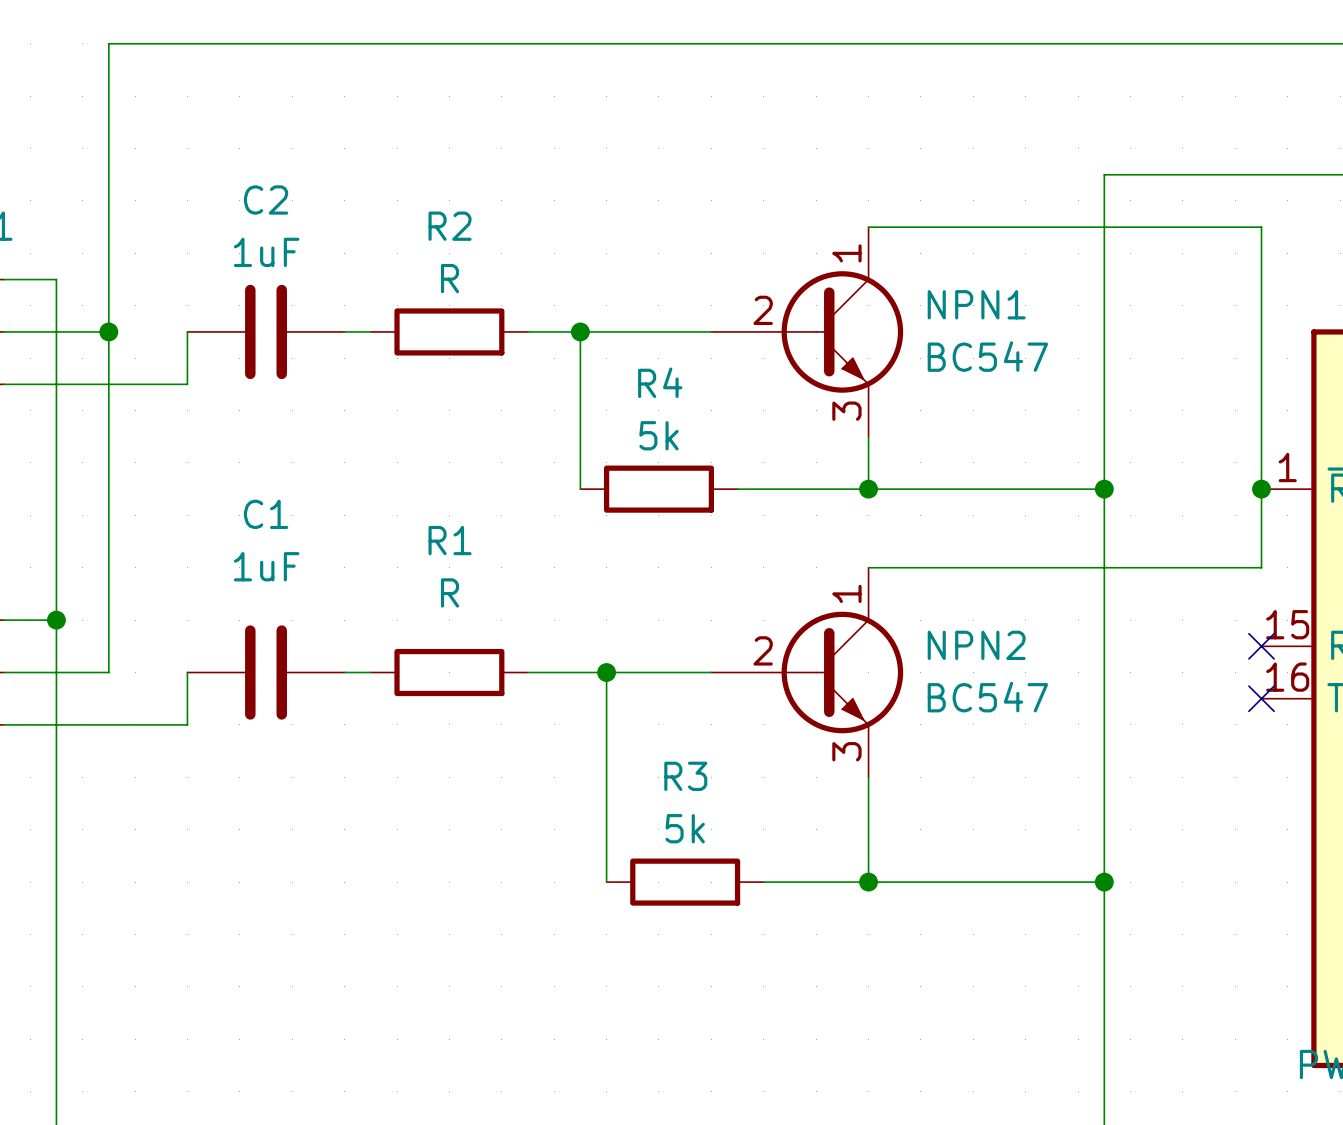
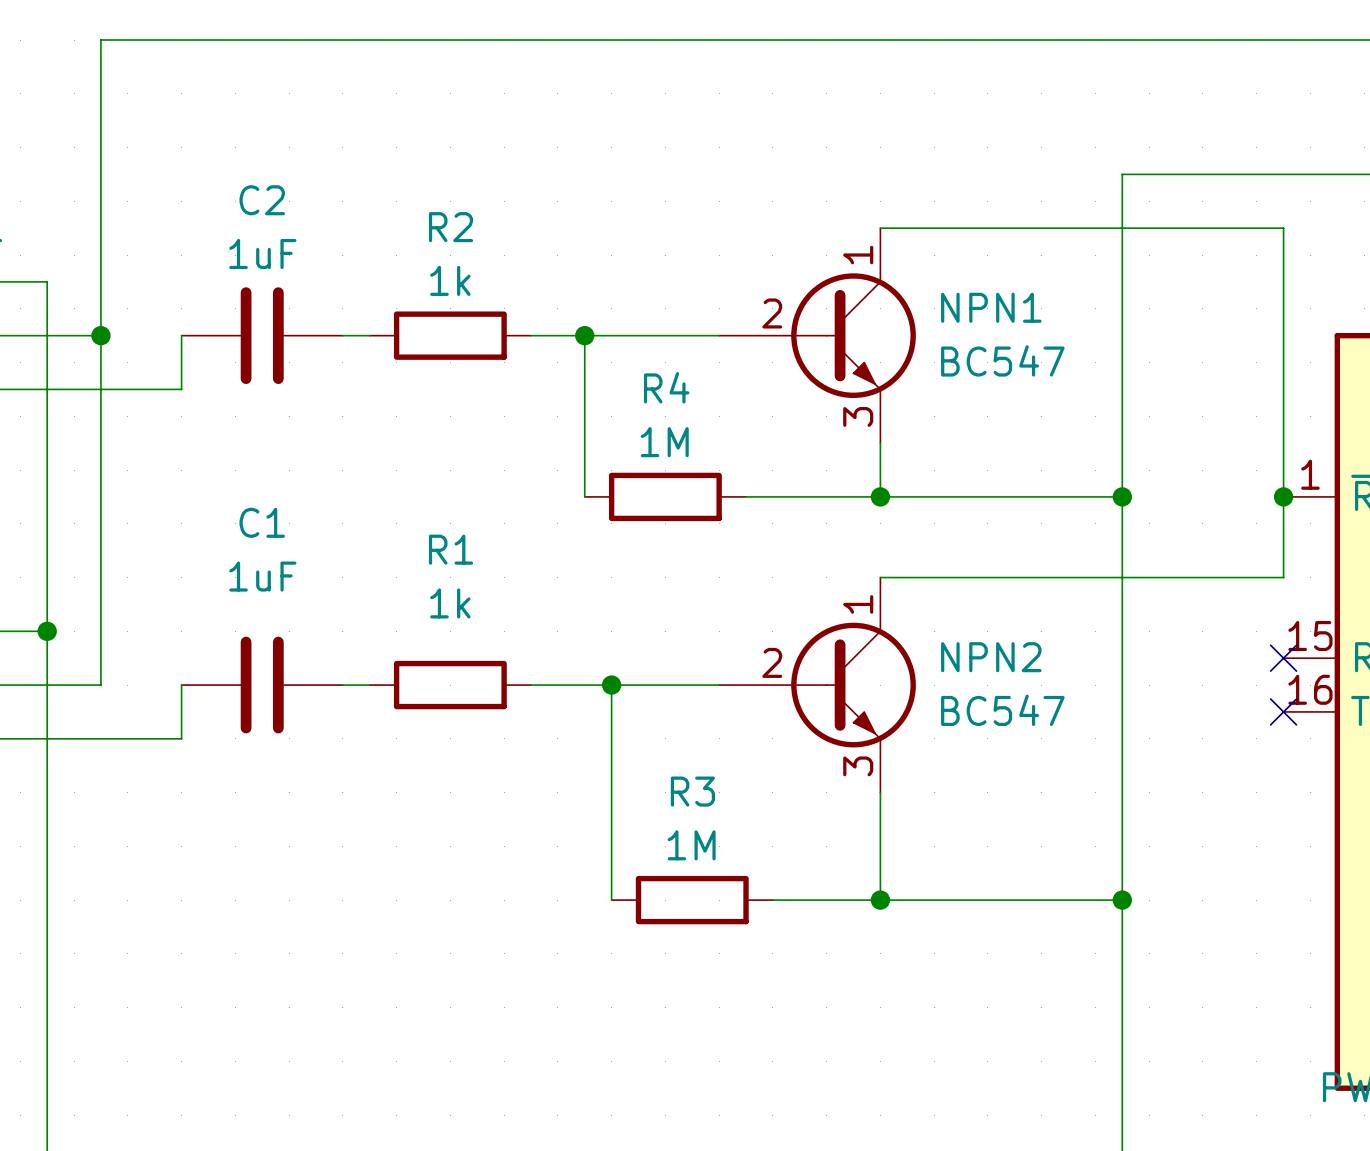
R2 value: R (450, 278) -> 1k (450, 280)
R4 value: 5k (658, 435) -> 1M (664, 442)
R1 value: R (450, 592) -> 1k (450, 603)
R3 value: 5k (685, 828) -> 1M (691, 845)

